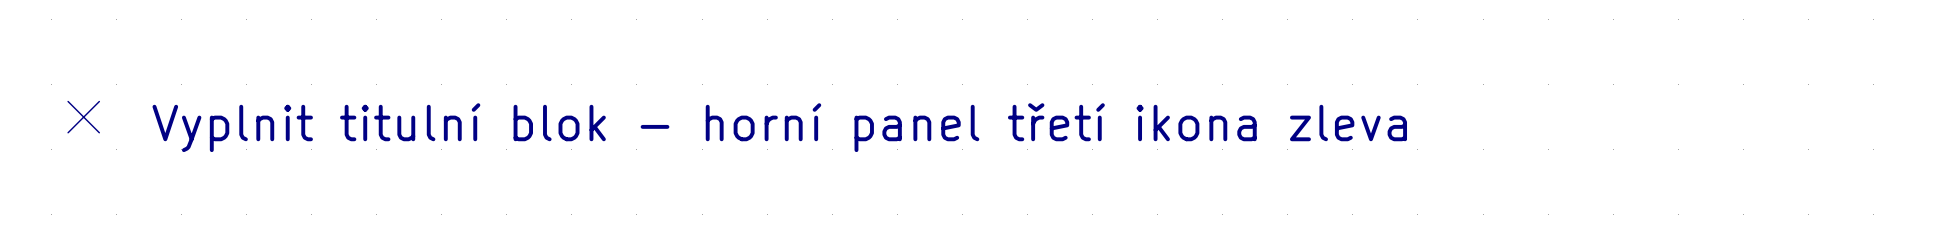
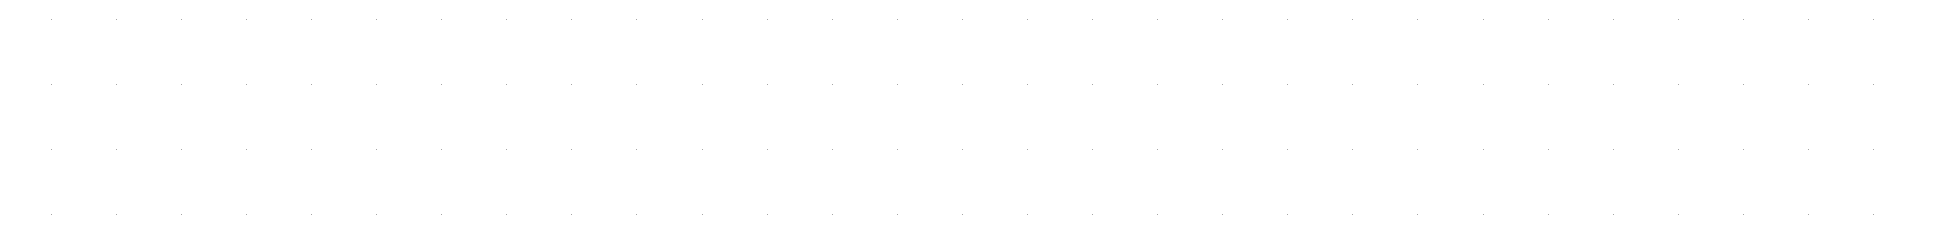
no-connect mark: (83, 117) -> none
text: Vyplnit titulní blok - horní panel třetí ikona zleva (779, 127) -> none

